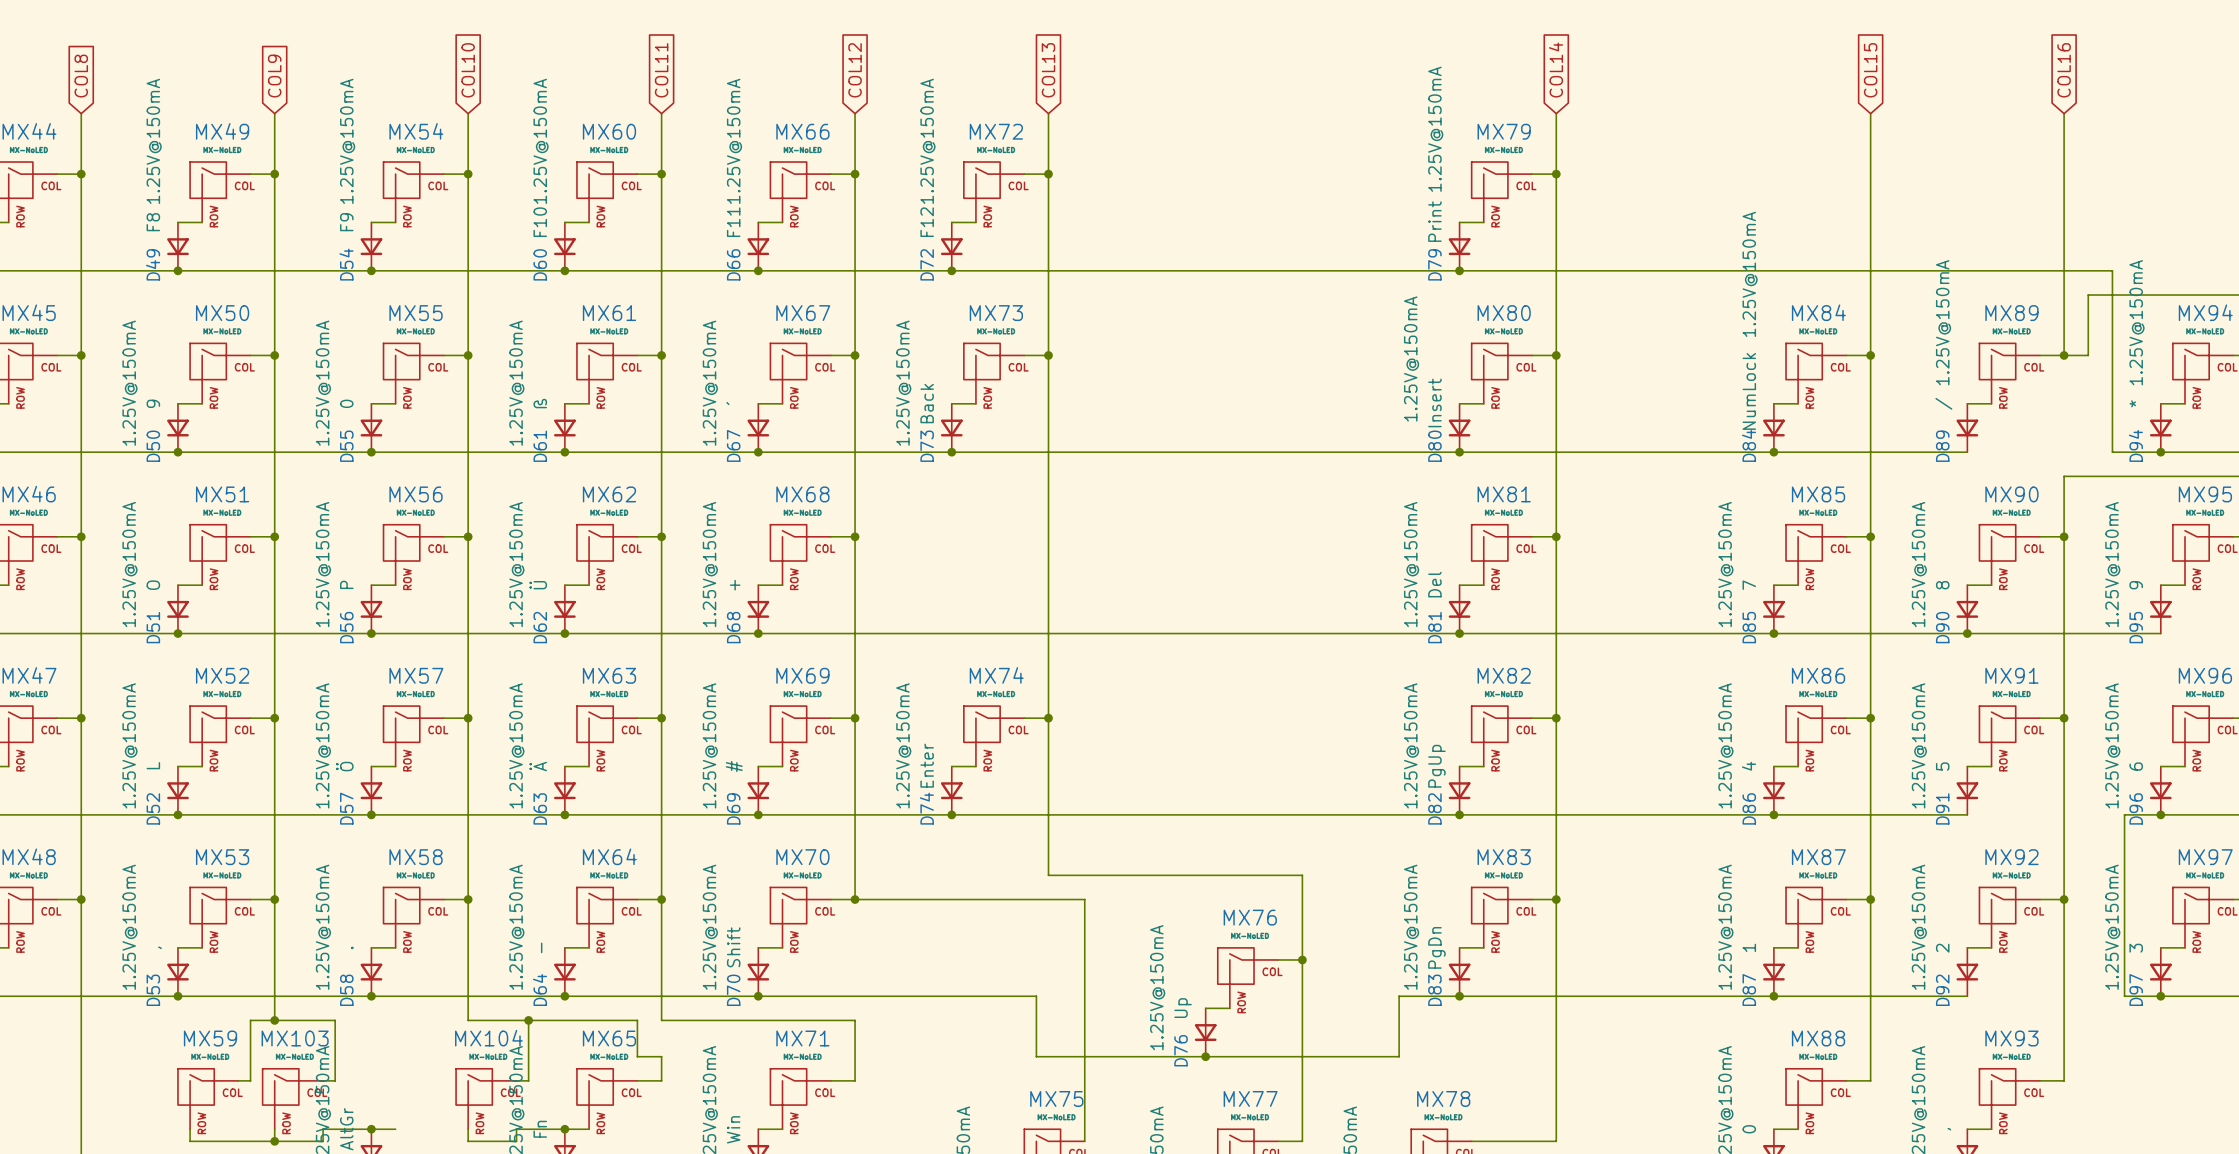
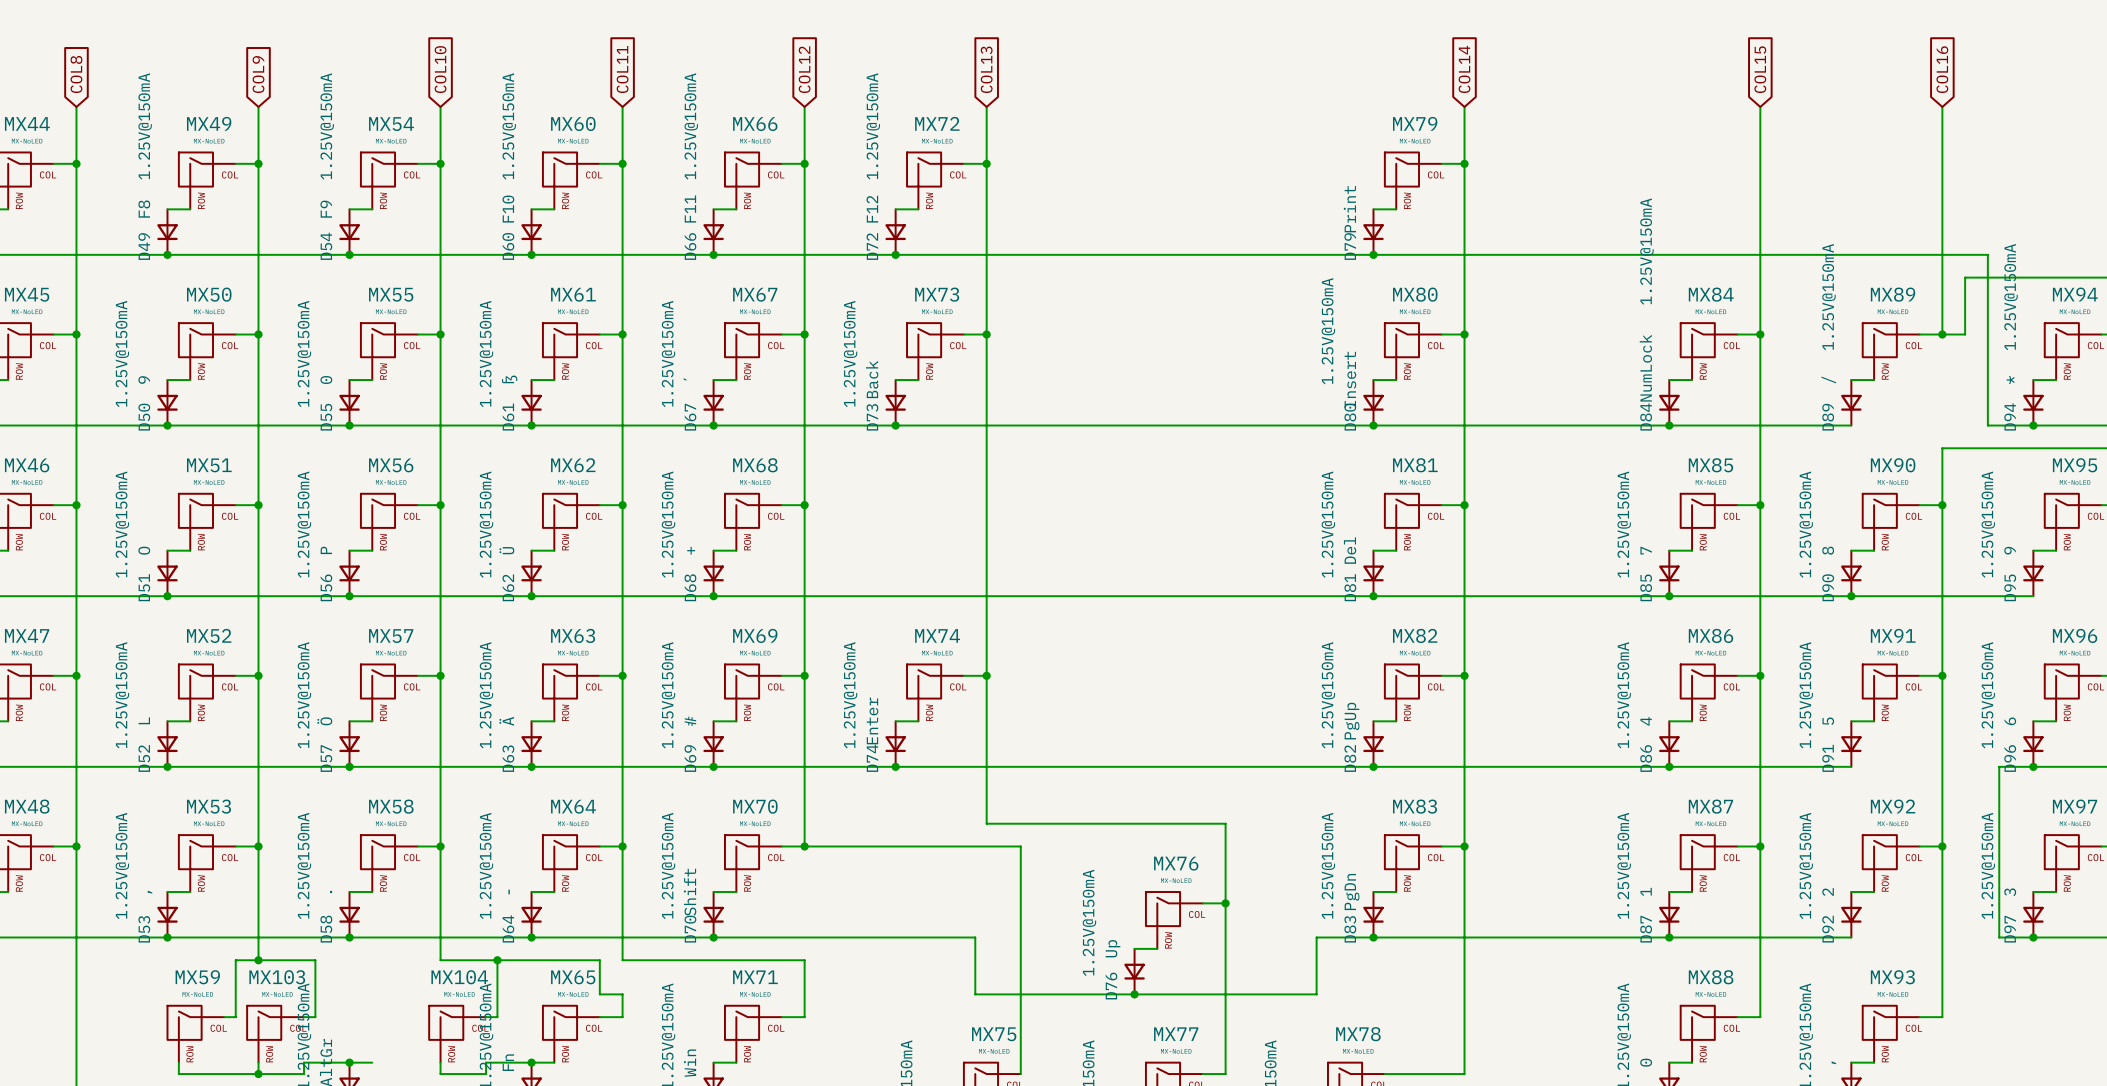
D79 value: 1.25V@150mA (1435, 129) -> none

